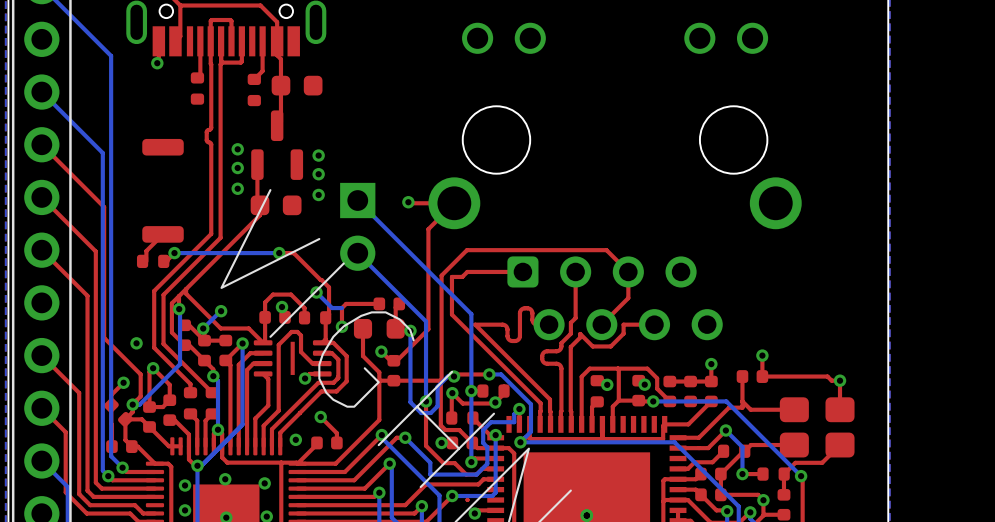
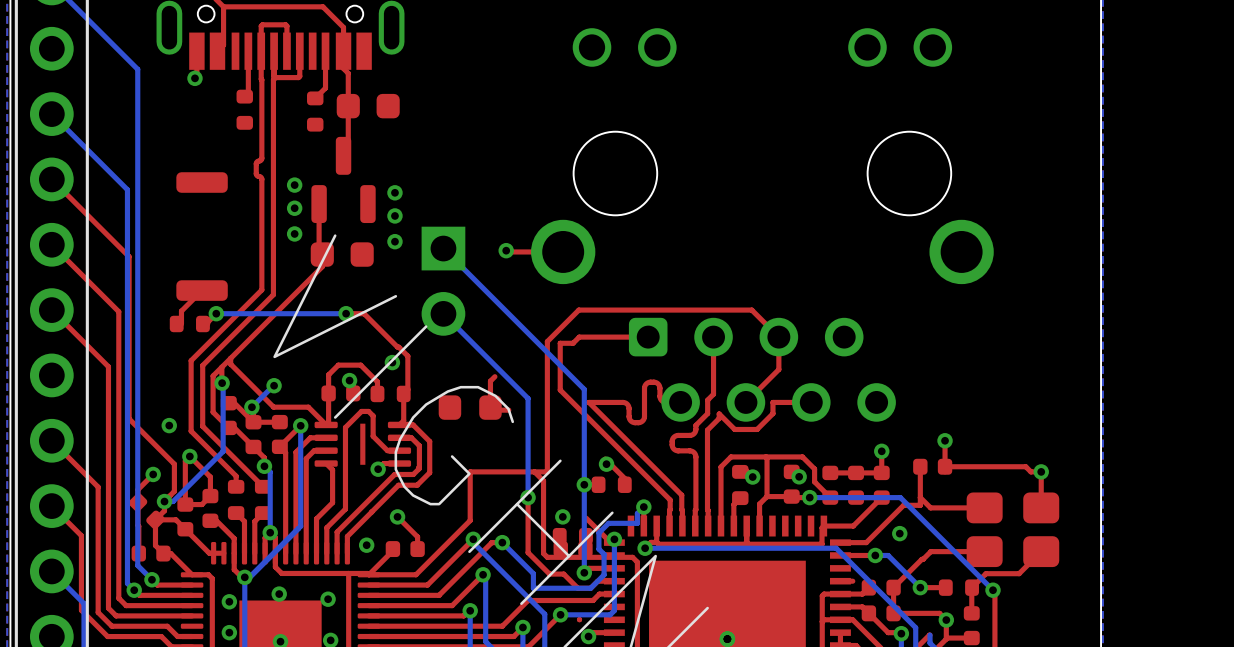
top track: (454, 203) (428, 229) (428, 329) (396, 360) (390, 360) (381, 351) -> none
bottom track: (316, 292) (332, 308) (341, 308) -> none
top track: (379, 303) (346, 303) (341, 308) (341, 326) -> none
part: (389, 303) -> none
via: (341, 326) -> none
top track: (362, 328) (362, 356) (379, 372) (379, 380) -> none
bottom track: (410, 330) (410, 402) (421, 413) (430, 413) (437, 406) (437, 386) (447, 376) (454, 376) -> none
via: (410, 330) -> none
via: (381, 351) -> none
part: (393, 370) -> none
top track: none -> (605, 459) (624, 478)
top track: (489, 374) (456, 374) (454, 376) -> none
bottom track: (489, 374) (501, 374) (530, 404) (530, 431) (520, 442) -> none
via: (454, 376) -> none
top track: (441, 380) (440, 425) (445, 430) (459, 430) (477, 448) (510, 449) -> (534, 471) (543, 480) (543, 553) (547, 557) (632, 557)
top track: (504, 391) (504, 393) (494, 403) (462, 403) (452, 393) (449, 393) (451, 395) (451, 418) -> none
via: (452, 393) -> none
via: (495, 402) -> none
via: none -> (562, 516)
part position: (462, 418) -> (572, 536)
top track: (725, 430) (706, 448) -> none
bottom track: (725, 430) (742, 447) (742, 474) -> (875, 555) (888, 555) (920, 587)
via: (441, 442) -> none
via: none -> (875, 555)
top track: (723, 451) (712, 462) (694, 462) (687, 468) -> none
part: (734, 451) -> none
via: (750, 512) -> none

